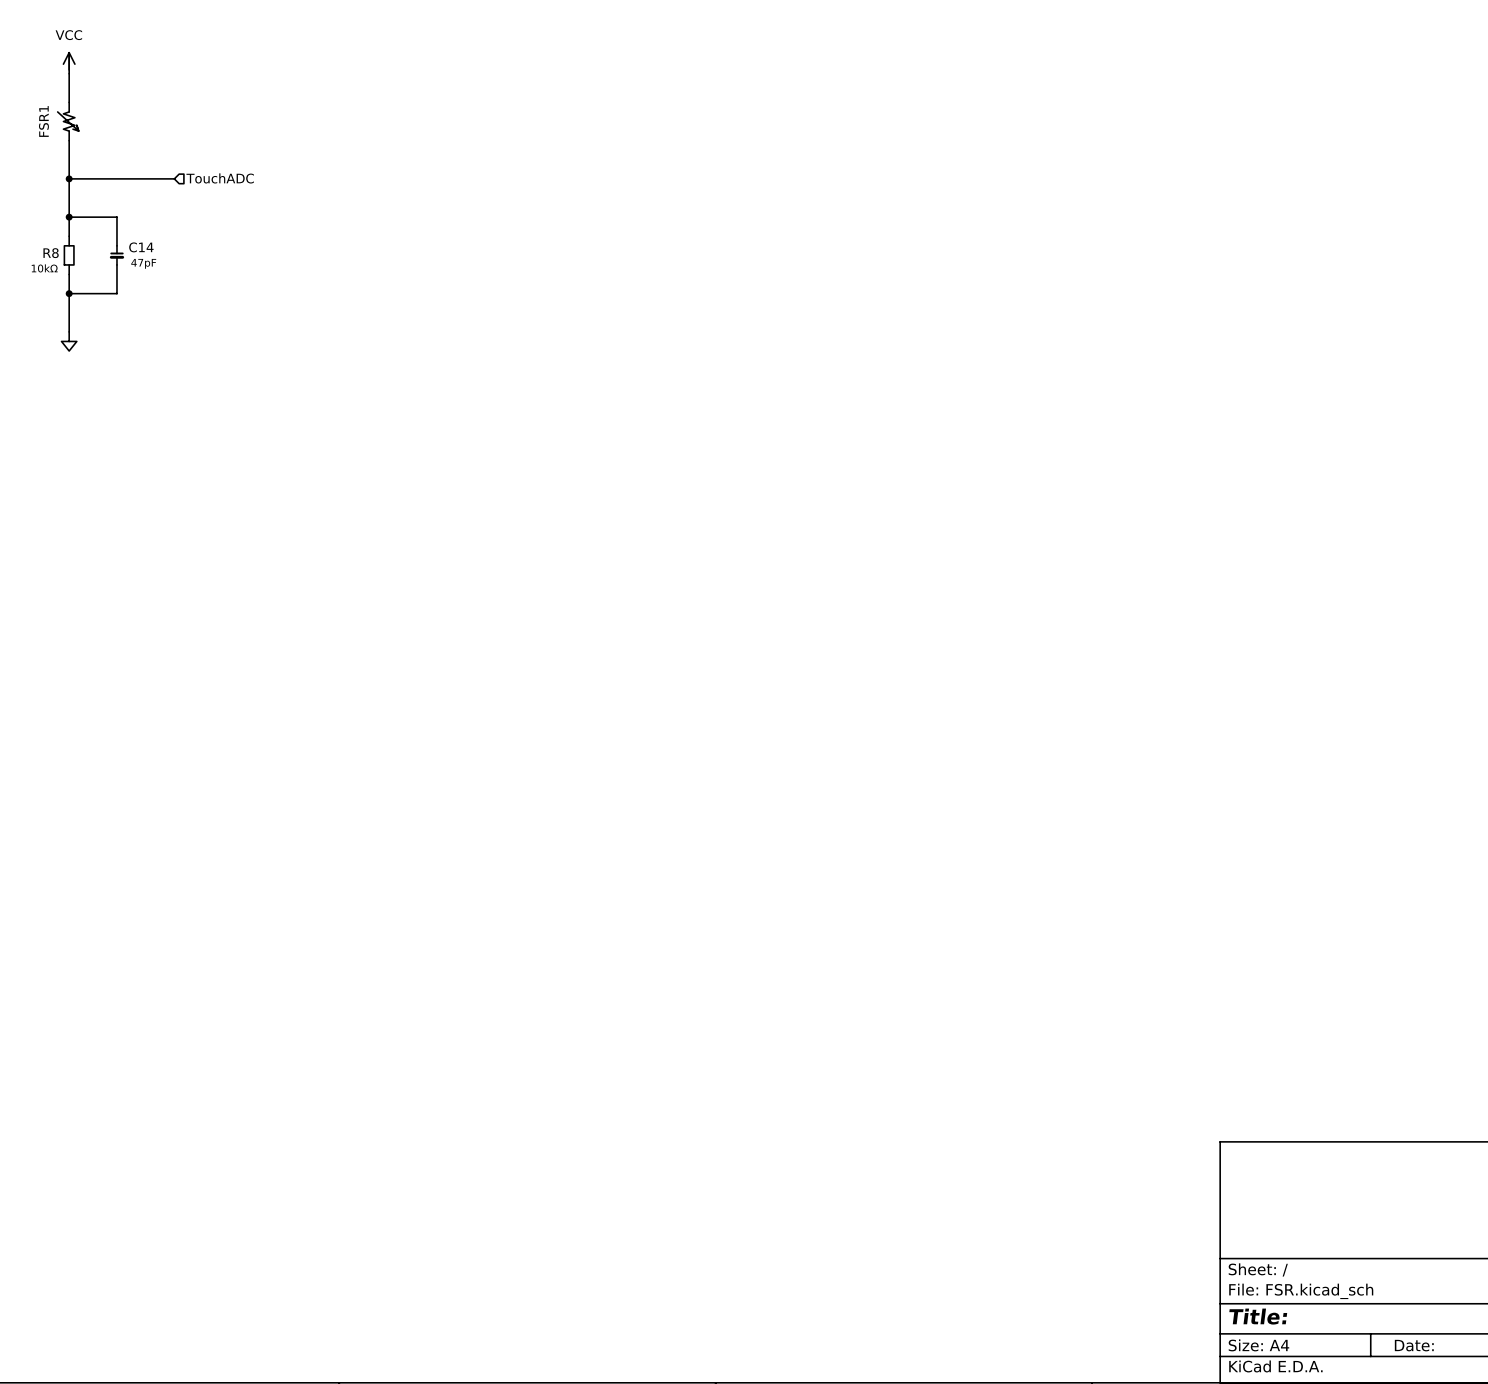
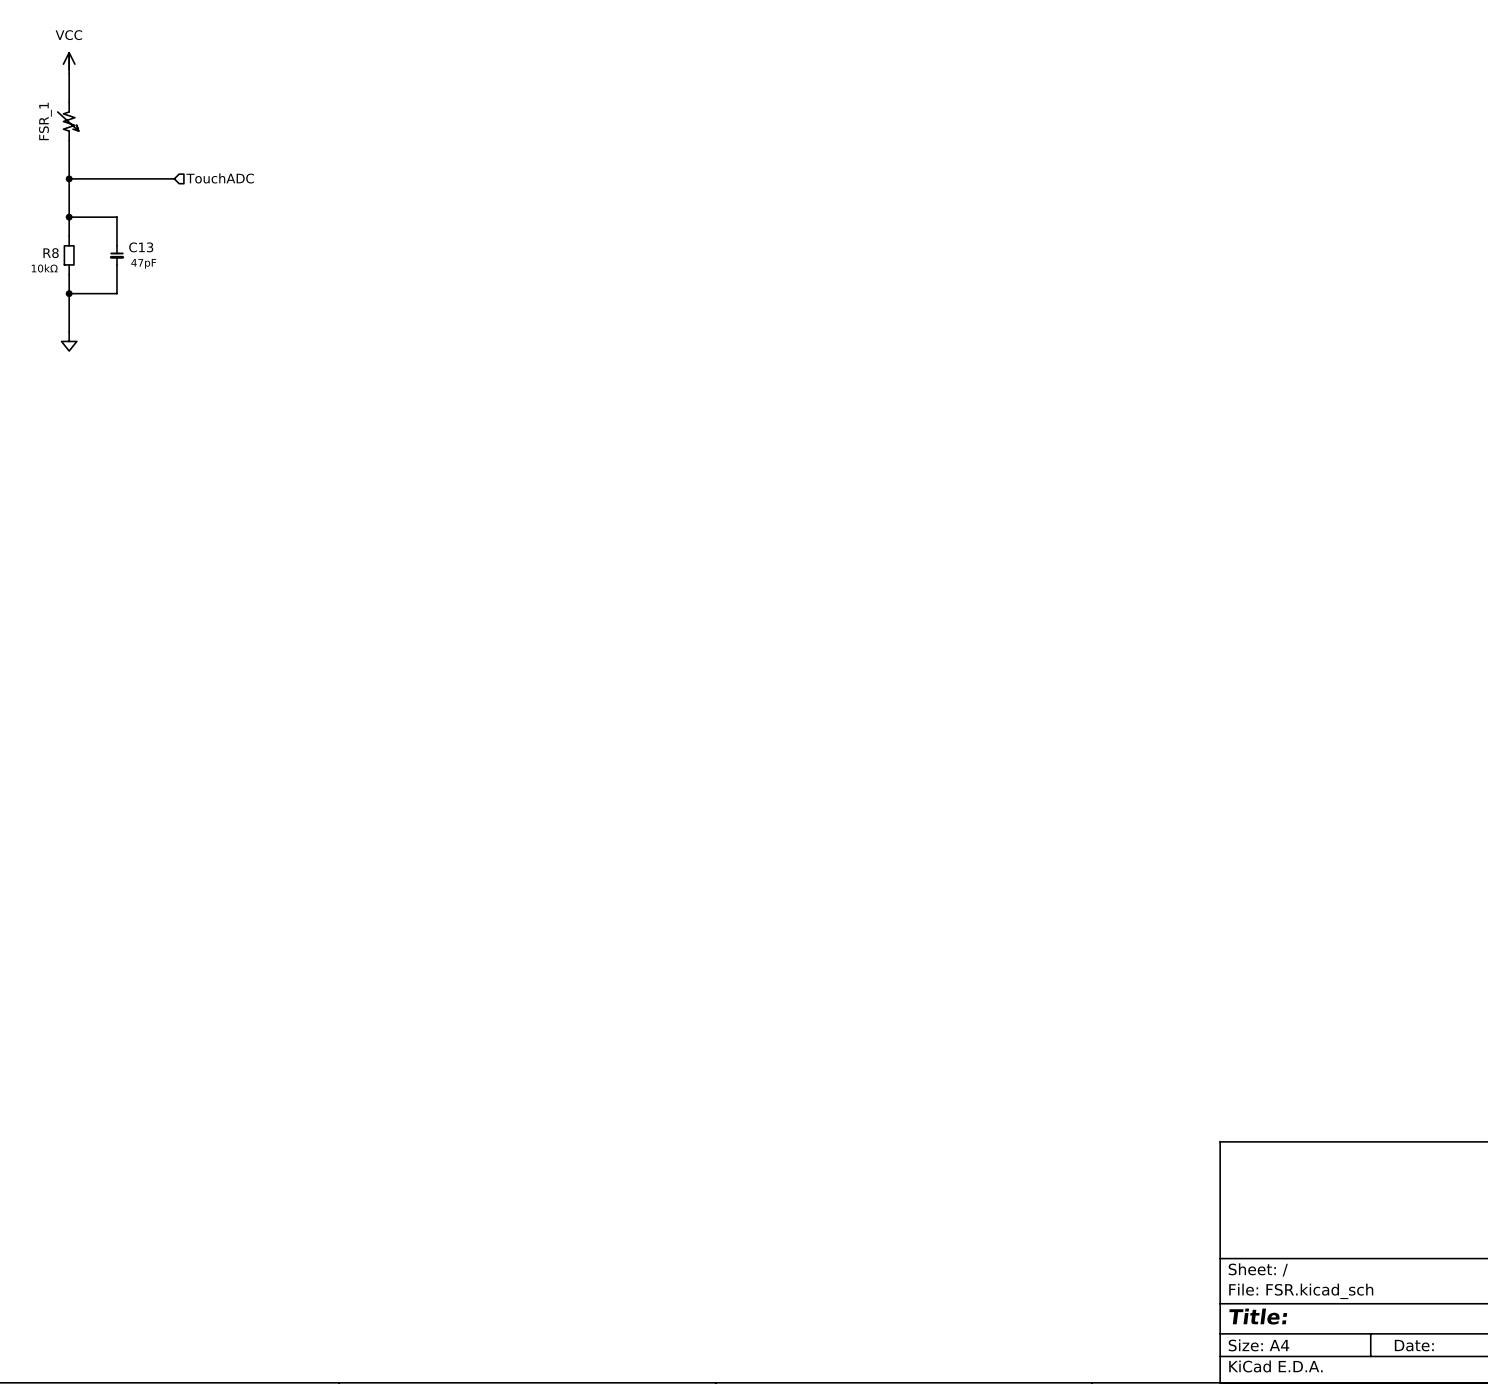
FSR1 name: FSR1 (43, 121) -> FSR_1 (45, 121)
C14 name: C14 (141, 247) -> C13 (141, 247)

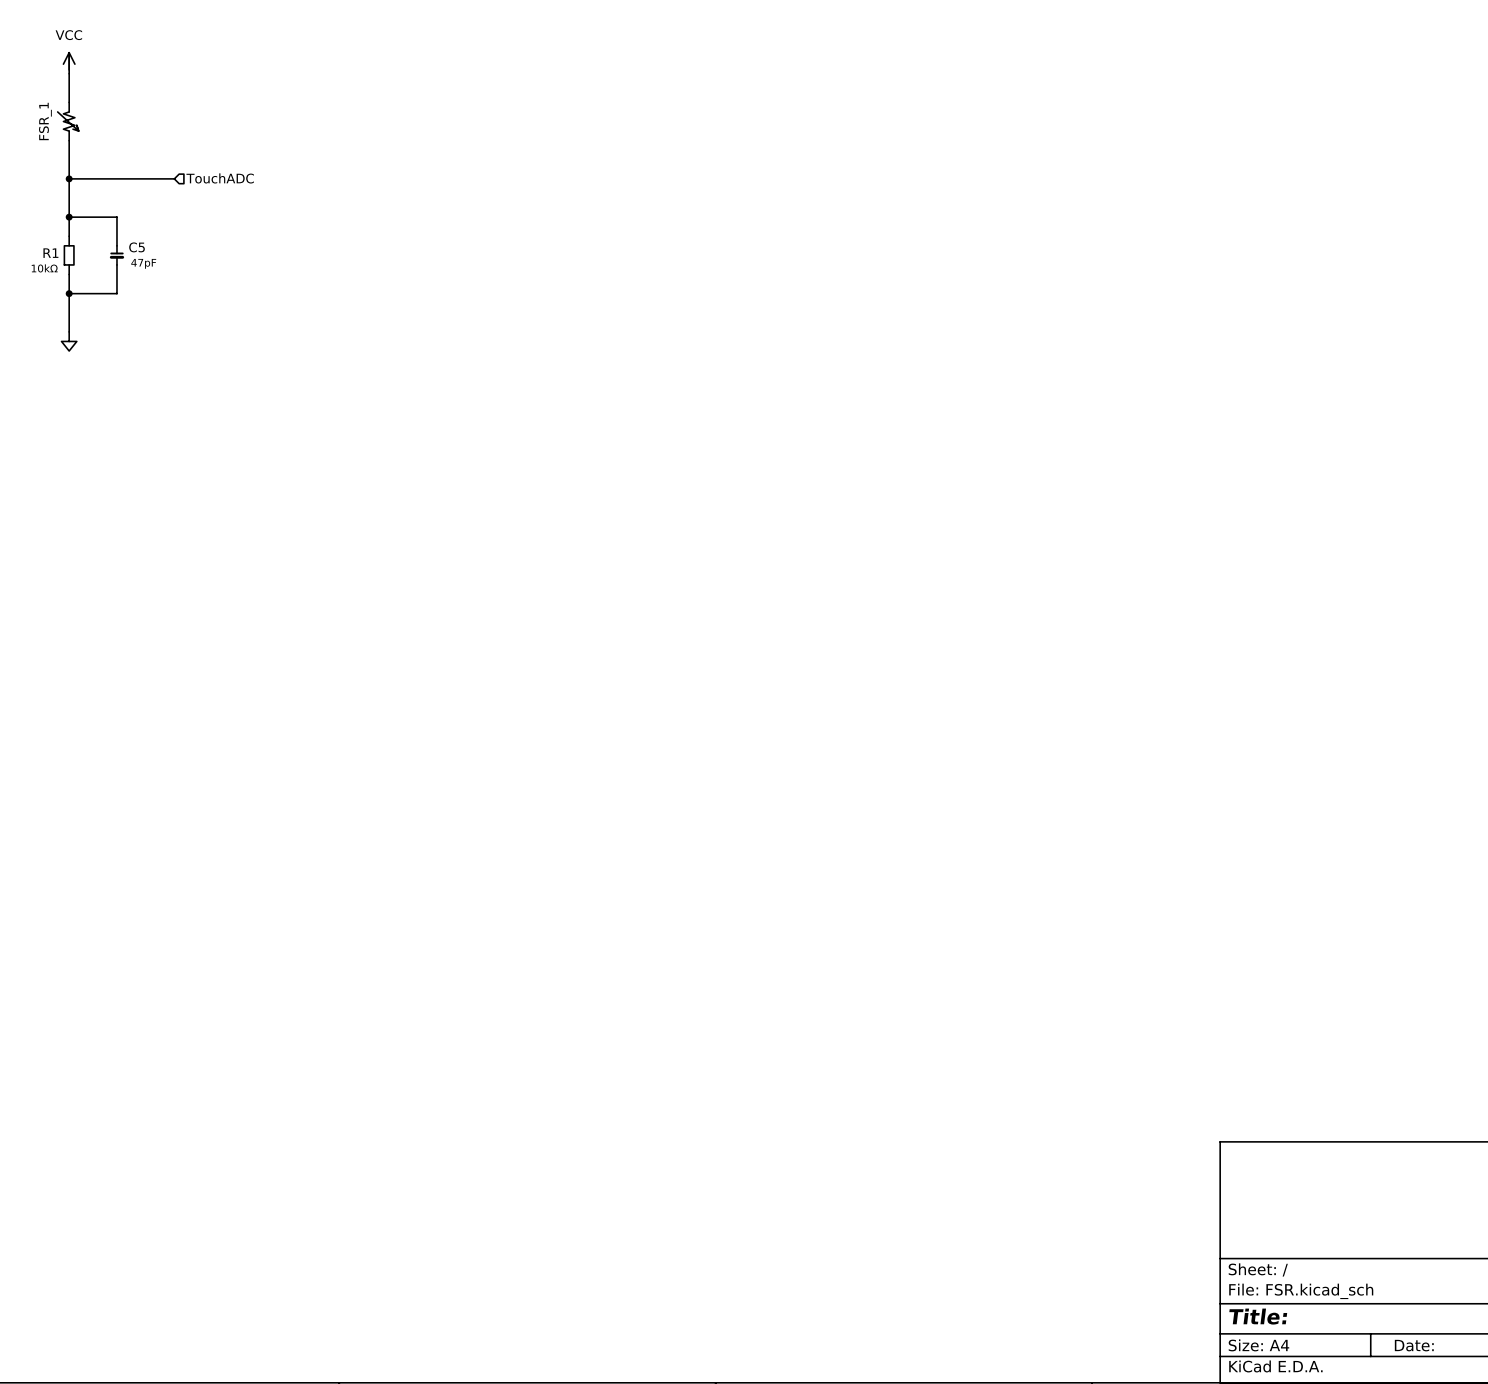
C13 name: C13 (141, 247) -> C5 (137, 247)
R8 name: R8 (51, 253) -> R1 (50, 253)

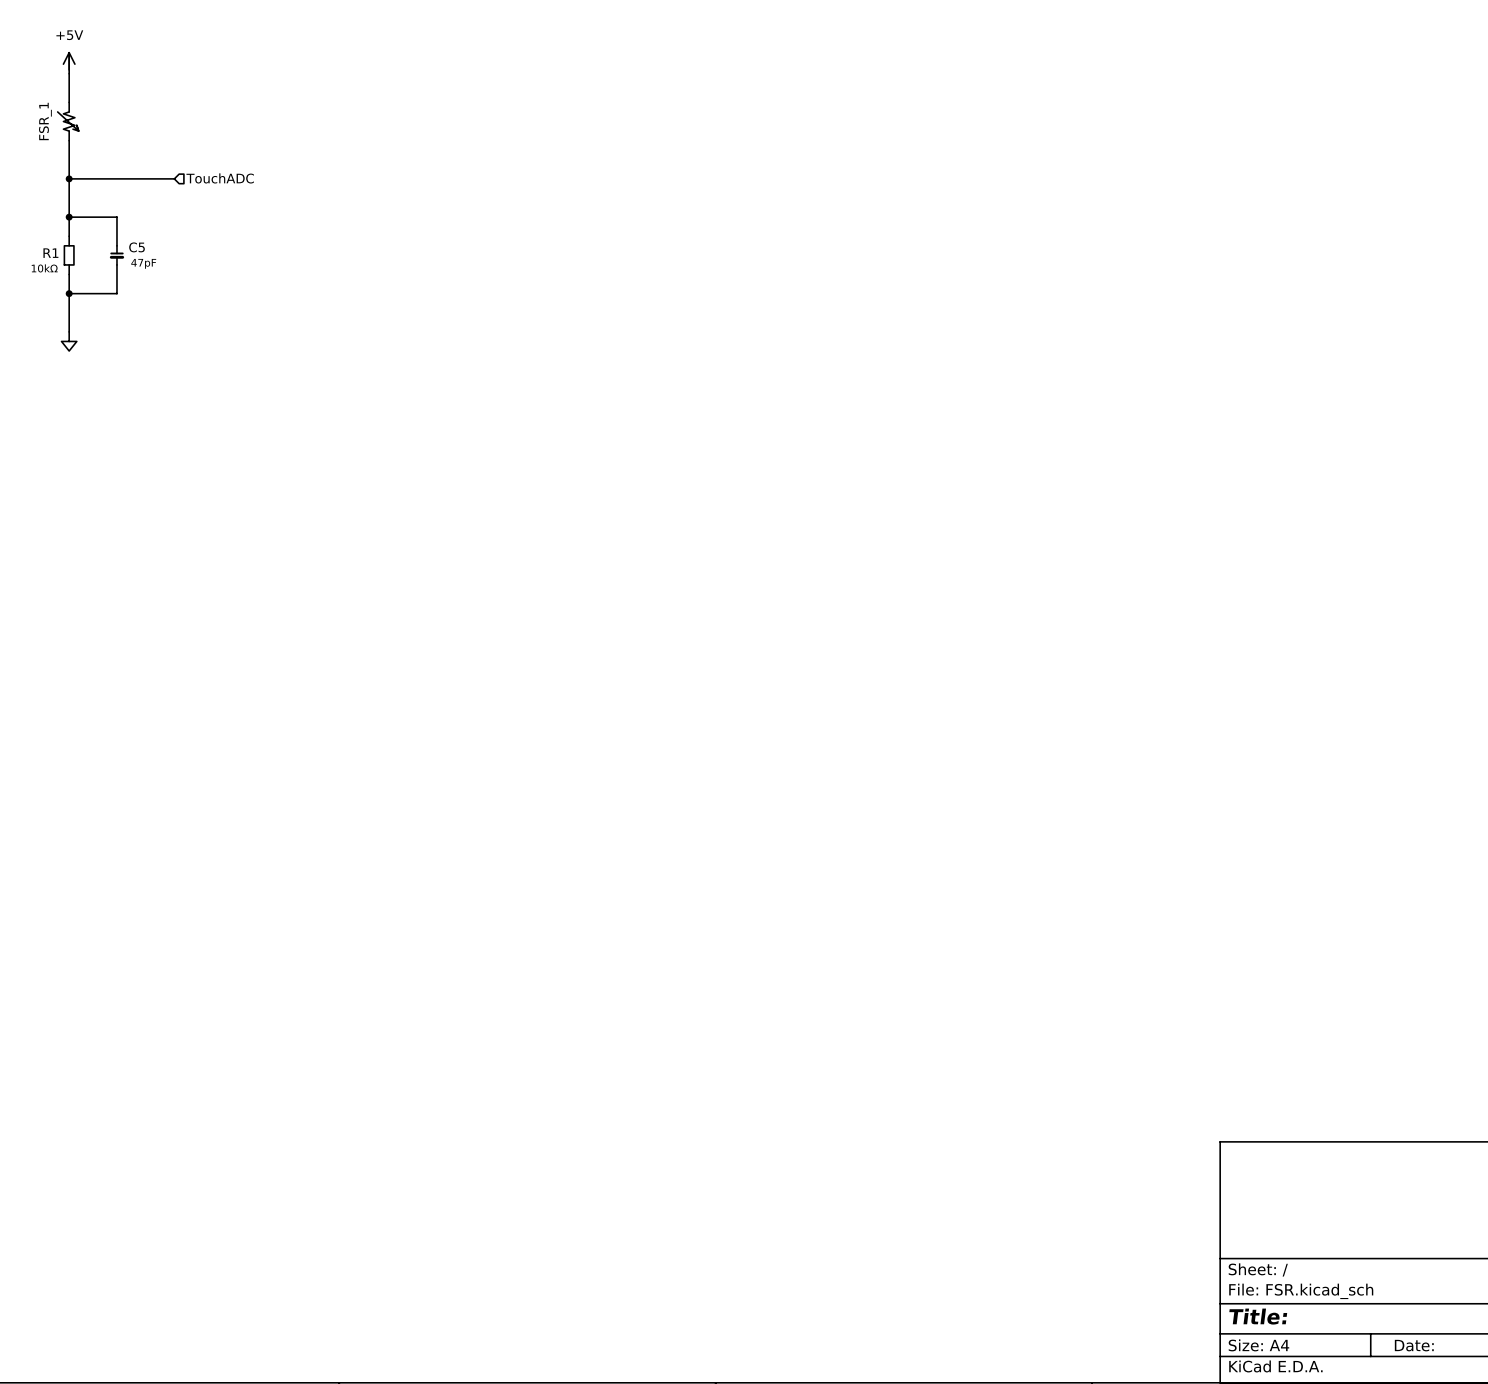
power symbol: VCC (69, 63) -> +5V (69, 63)

